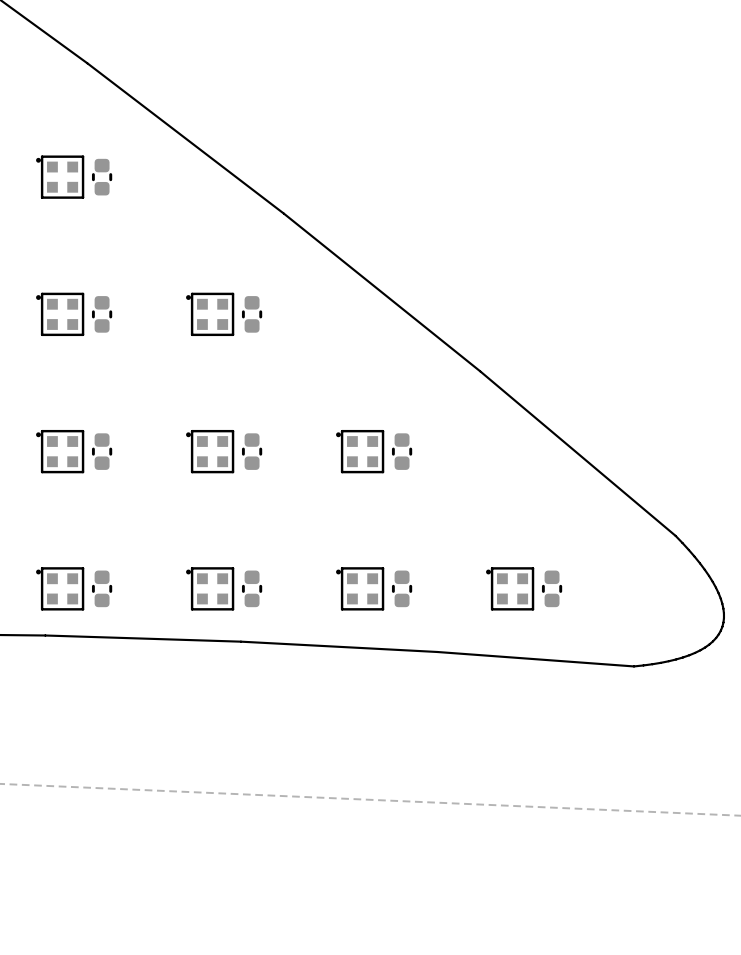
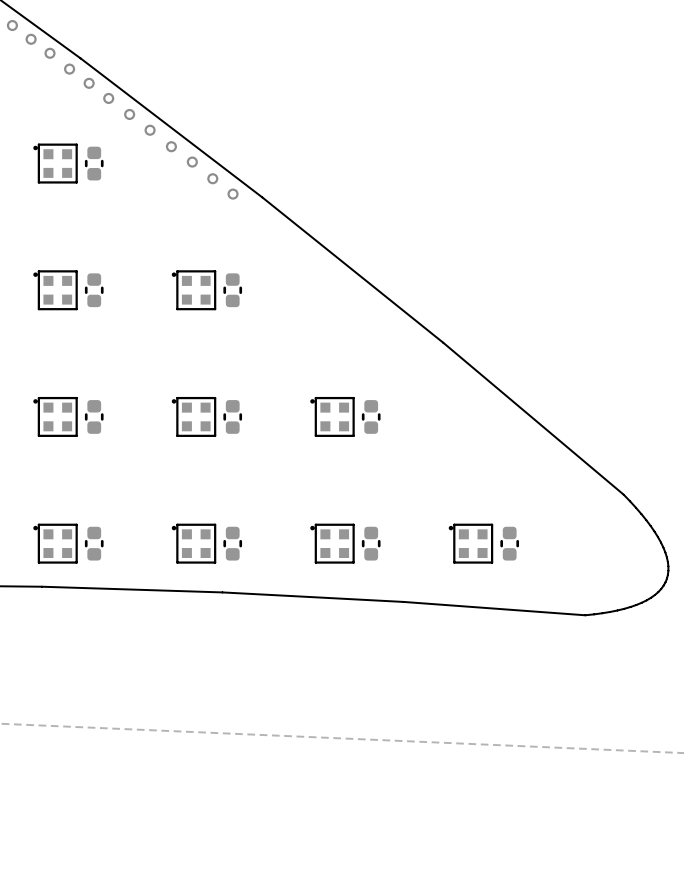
via: none -> (12, 25)
via: none -> (31, 39)
via: none -> (50, 53)
via: none -> (69, 69)
via: none -> (89, 83)
via: none -> (108, 98)
via: none -> (129, 114)
via: none -> (150, 130)
via: none -> (171, 146)
via: none -> (192, 162)
via: none -> (212, 178)
via: none -> (233, 194)

